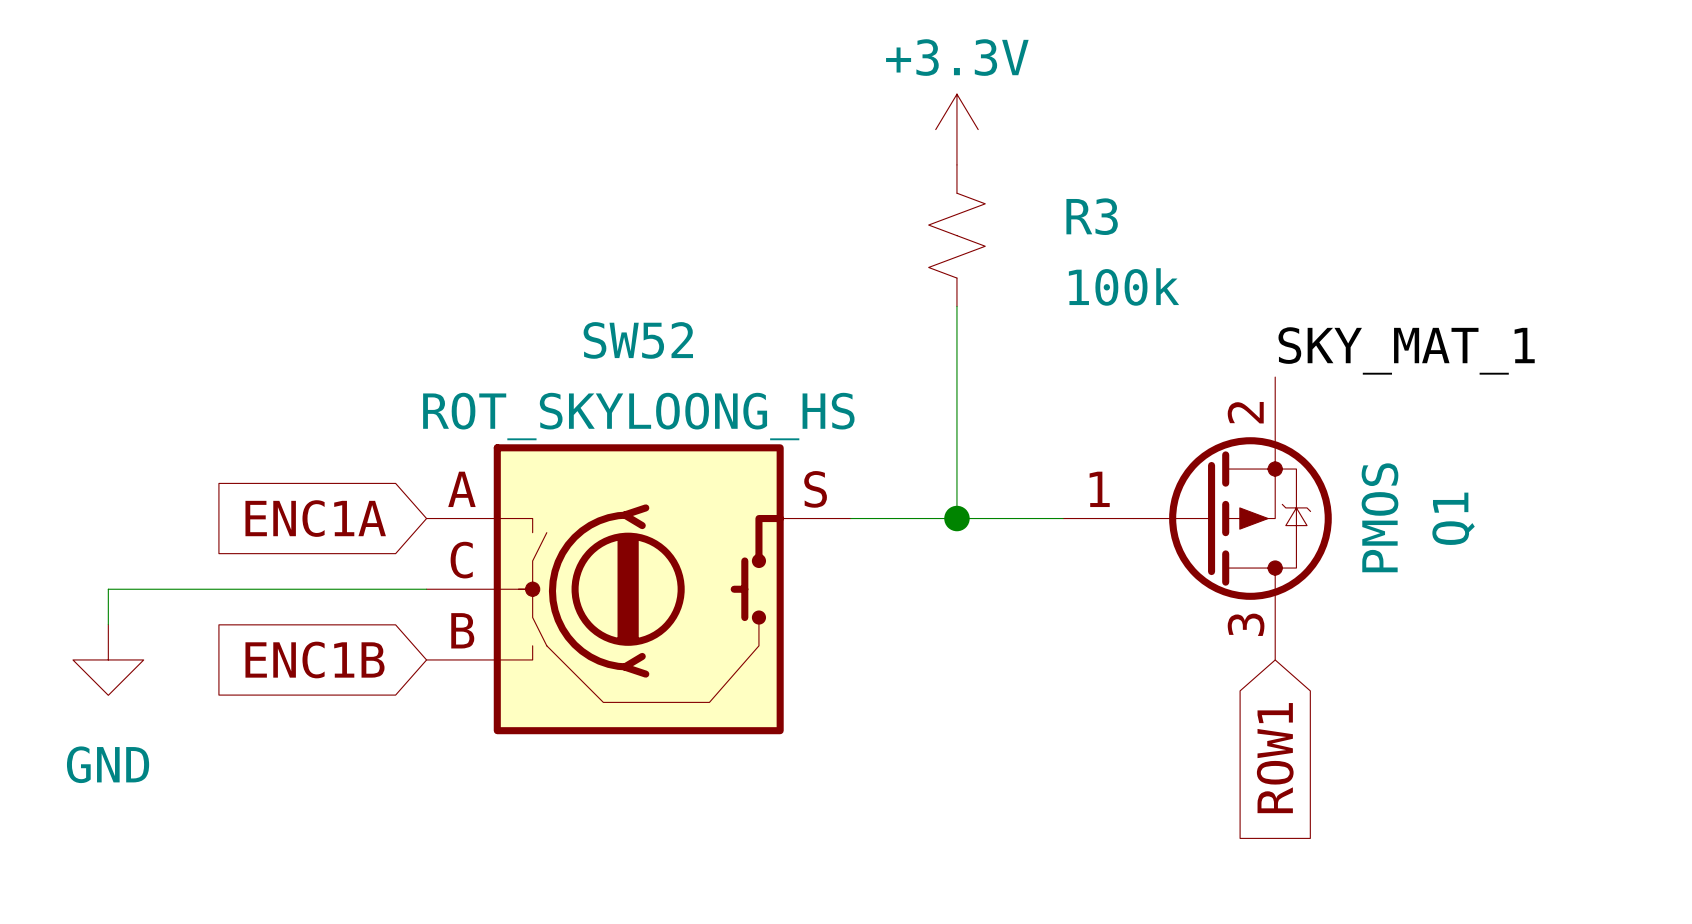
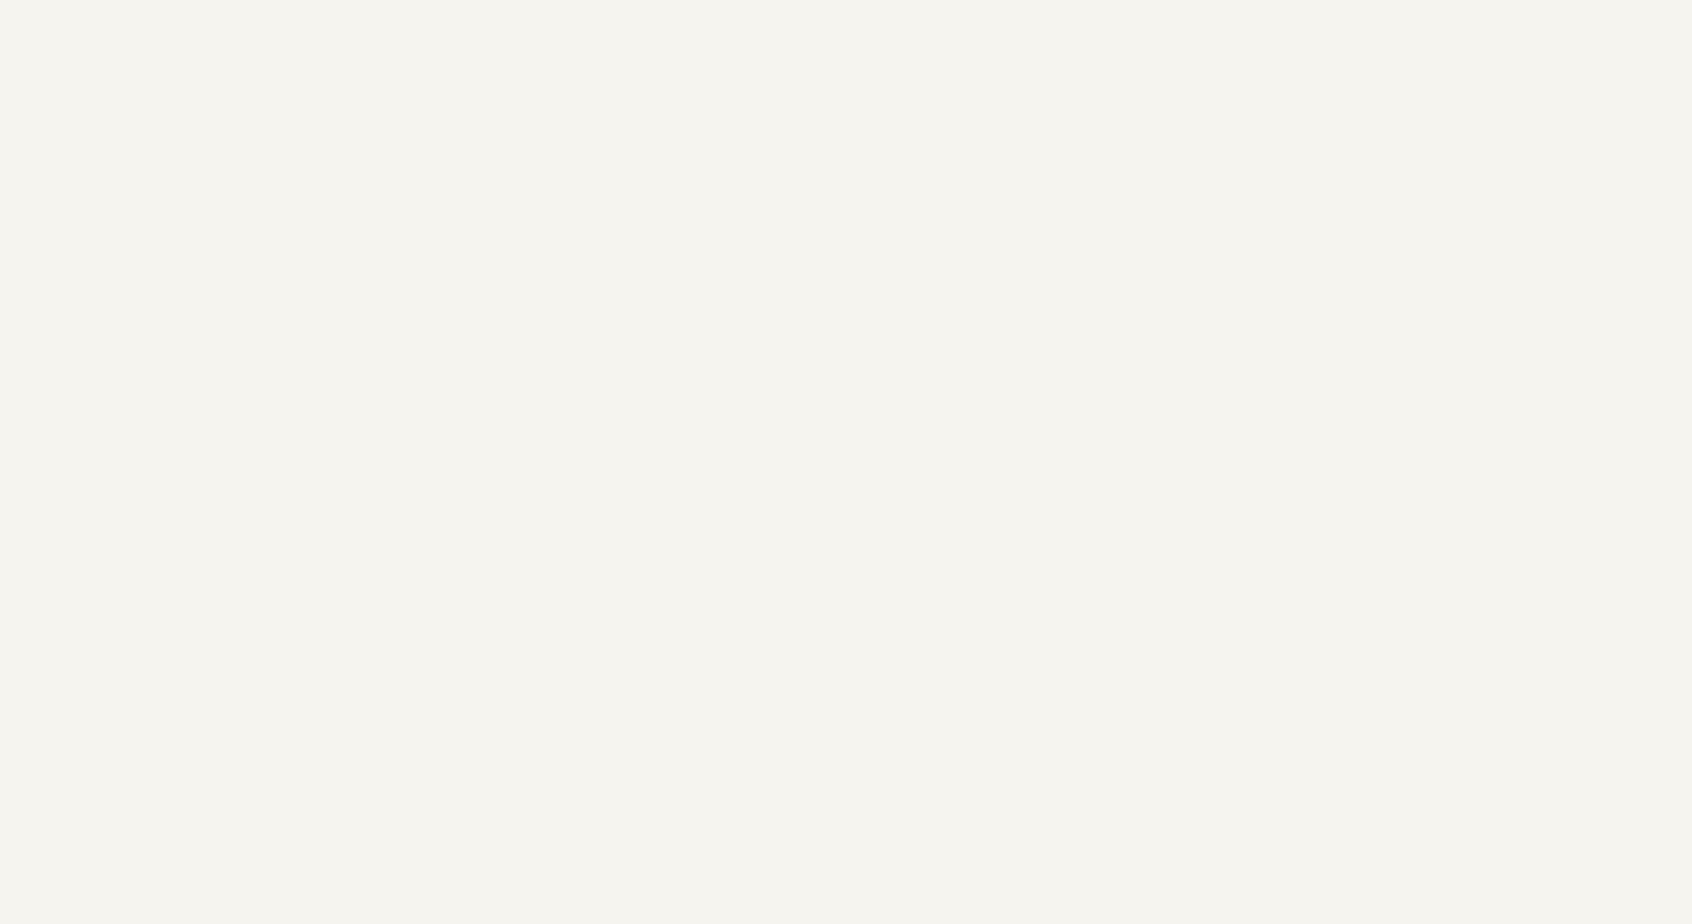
power symbol: +3.3V (956, 129) -> none
R3: 100k (956, 235) -> none
wire: (956, 306) (956, 518) -> none
label: SKY_MAT_1 (1406, 350) -> none
global label: ENC1A (315, 518) -> none
wire: (850, 518) (1063, 518) -> none
junction: (956, 518) -> none
Q1: PMOS (1197, 518) -> none
wire: (426, 589) (108, 589) (108, 624) -> none
SW52: ROT_SKYLOONG_HS (638, 589) -> none
power symbol: GND (108, 659) -> none
global label: ENC1B (314, 659) -> none
global label: ROW1 (1275, 758) -> none

